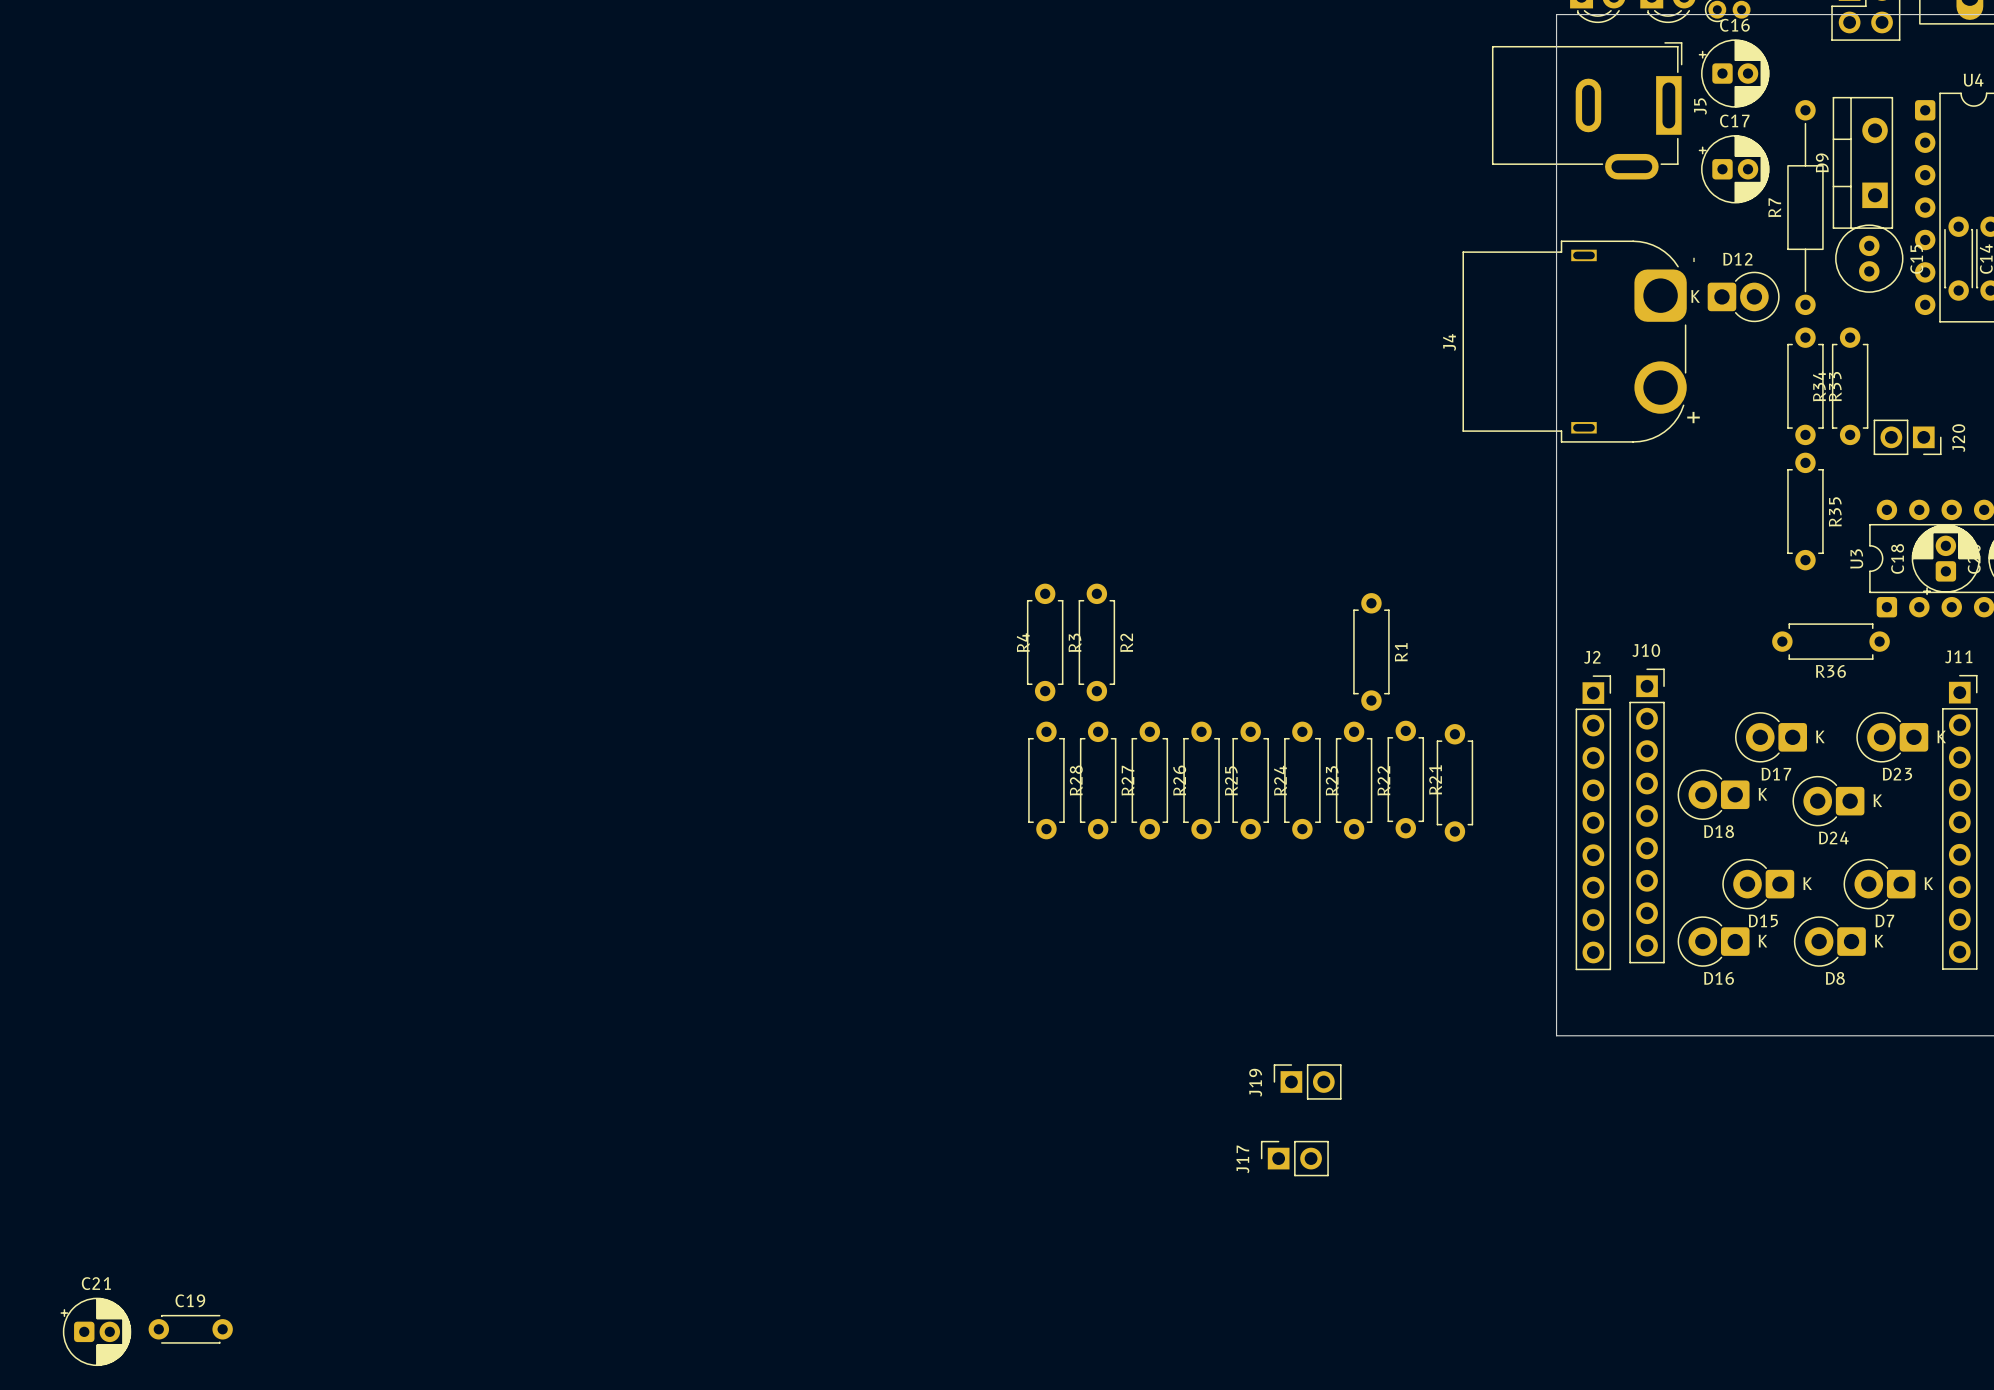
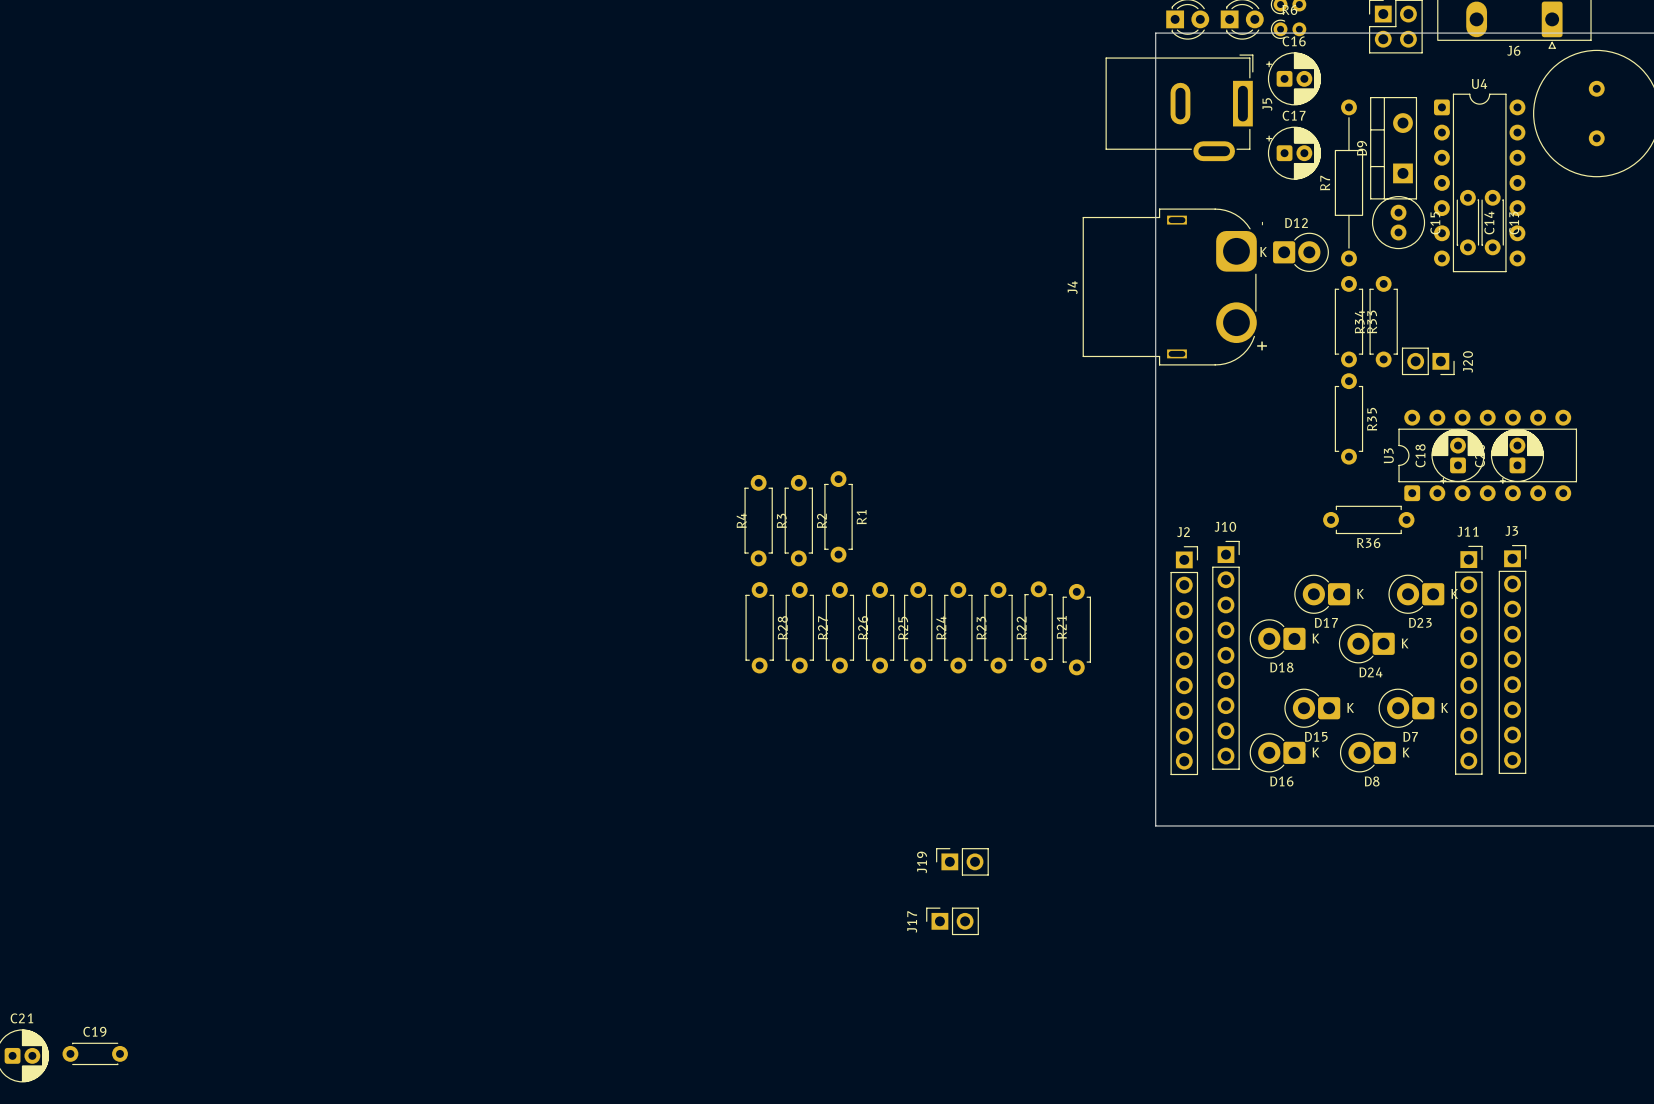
R1 position: (1371, 651) -> (838, 516)

